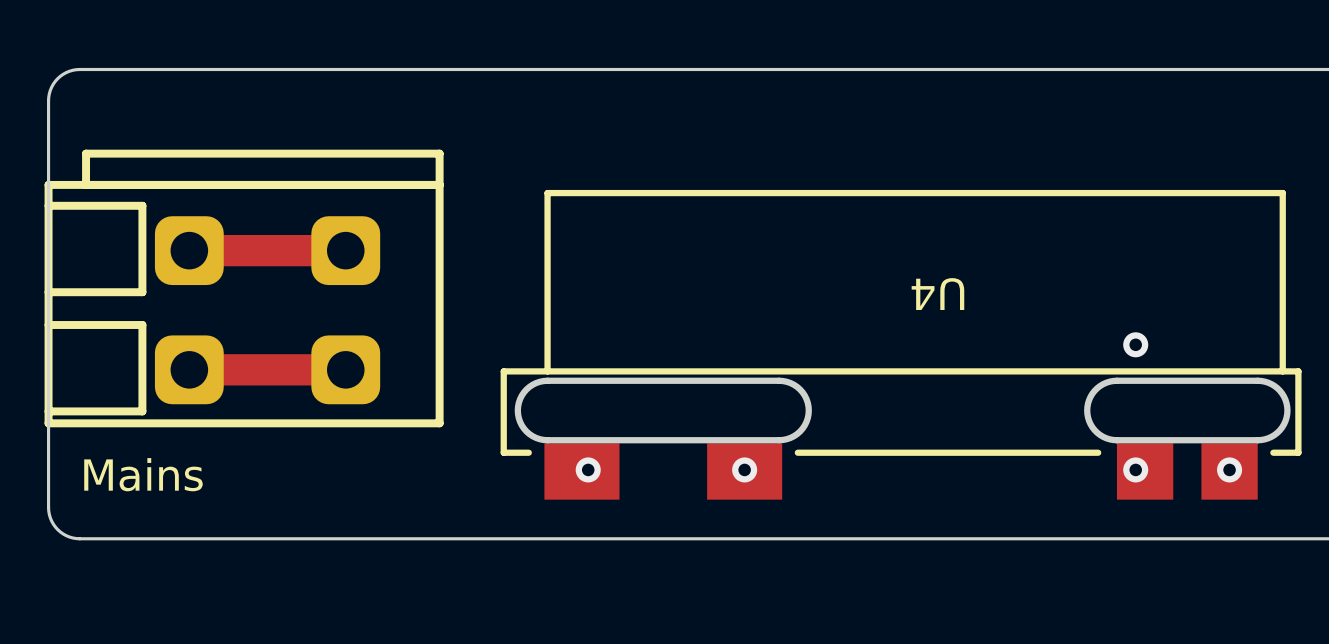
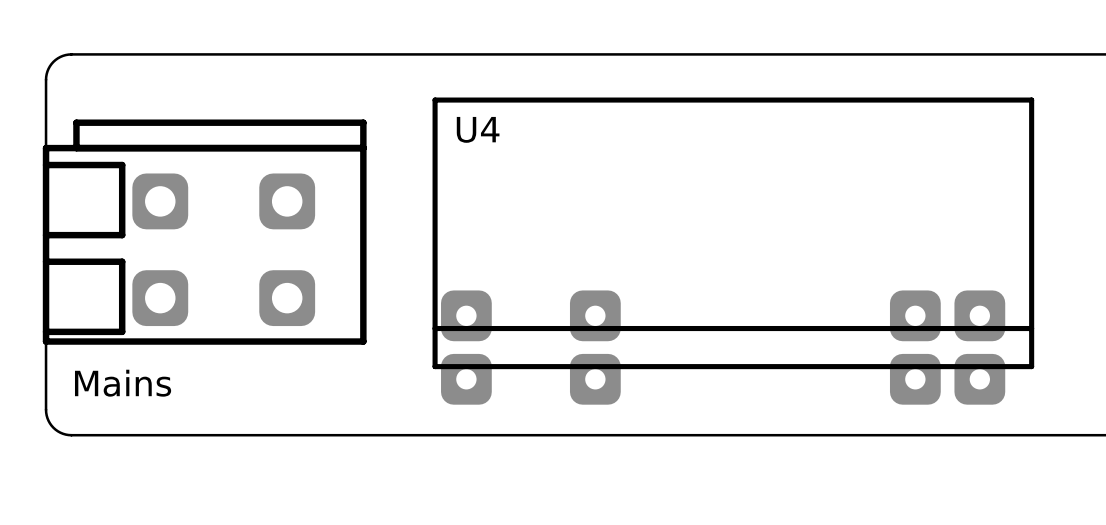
U4 footprint: [500, 189, 1302, 500] -> [432, 97, 1035, 405]
track: (189, 250) (345, 250) -> none
U4 name position: U4 (937, 294) -> U4 (478, 129)
via: (1135, 344) -> none
track: (189, 369) (345, 369) -> none
via: (588, 469) -> none
via: (744, 469) -> none
via: (1135, 469) -> none
via: (1229, 469) -> none

